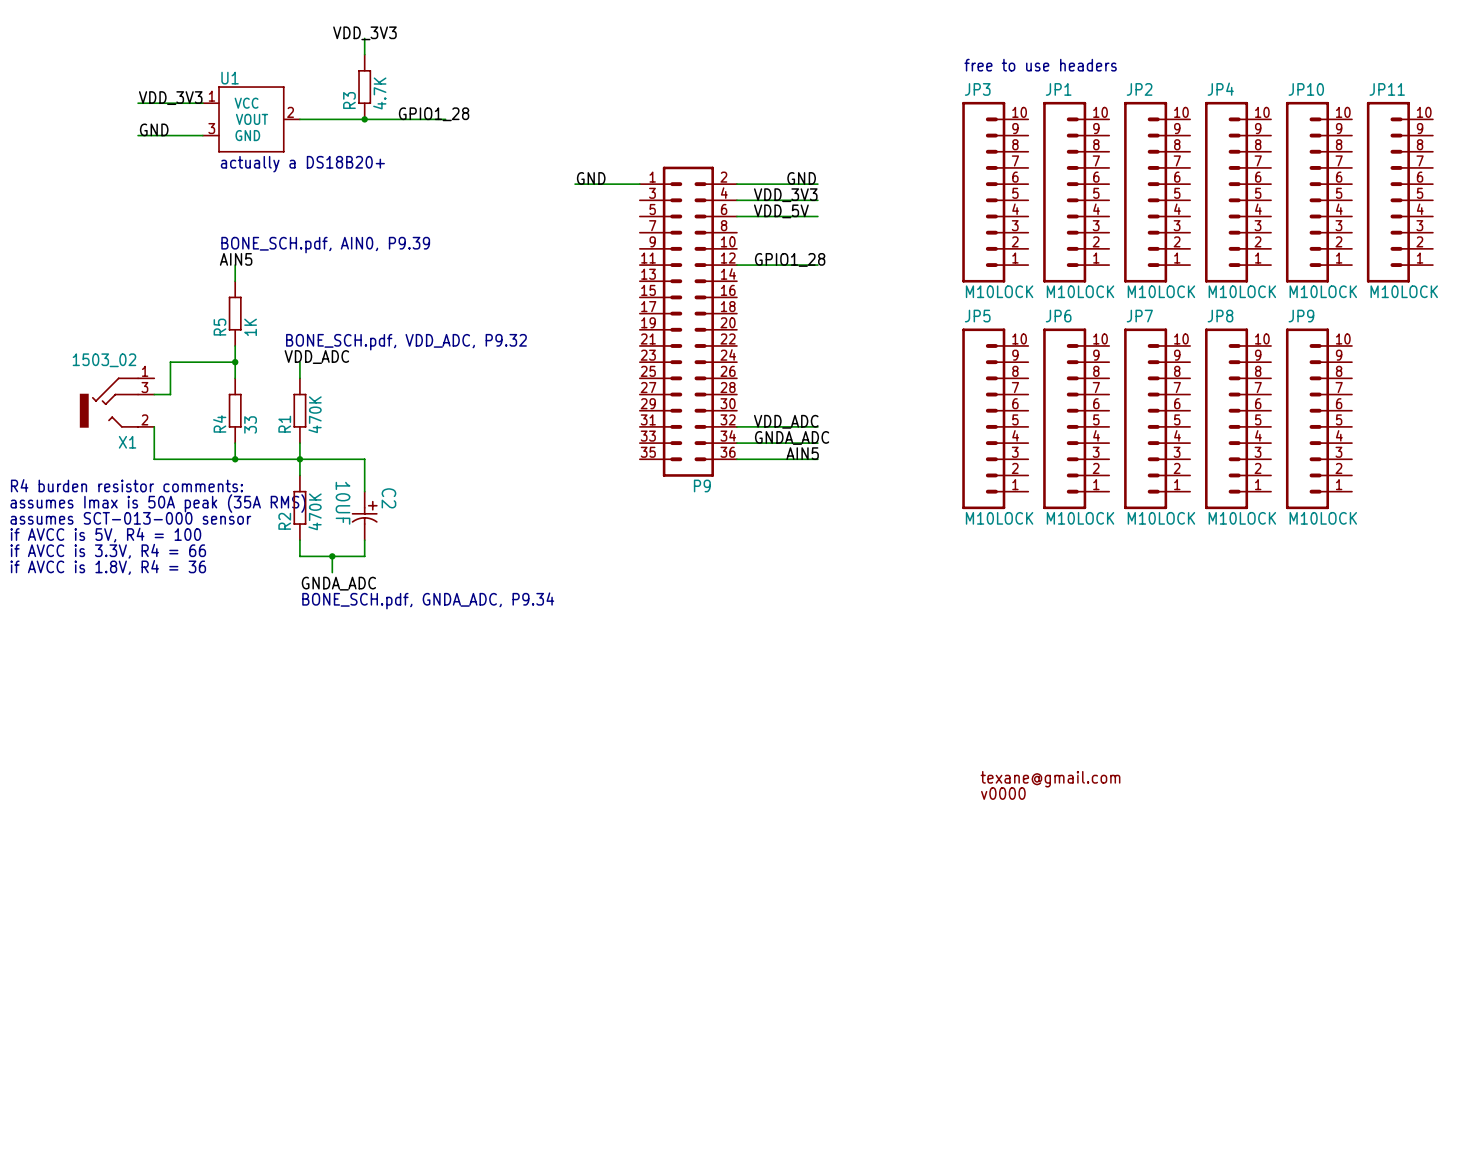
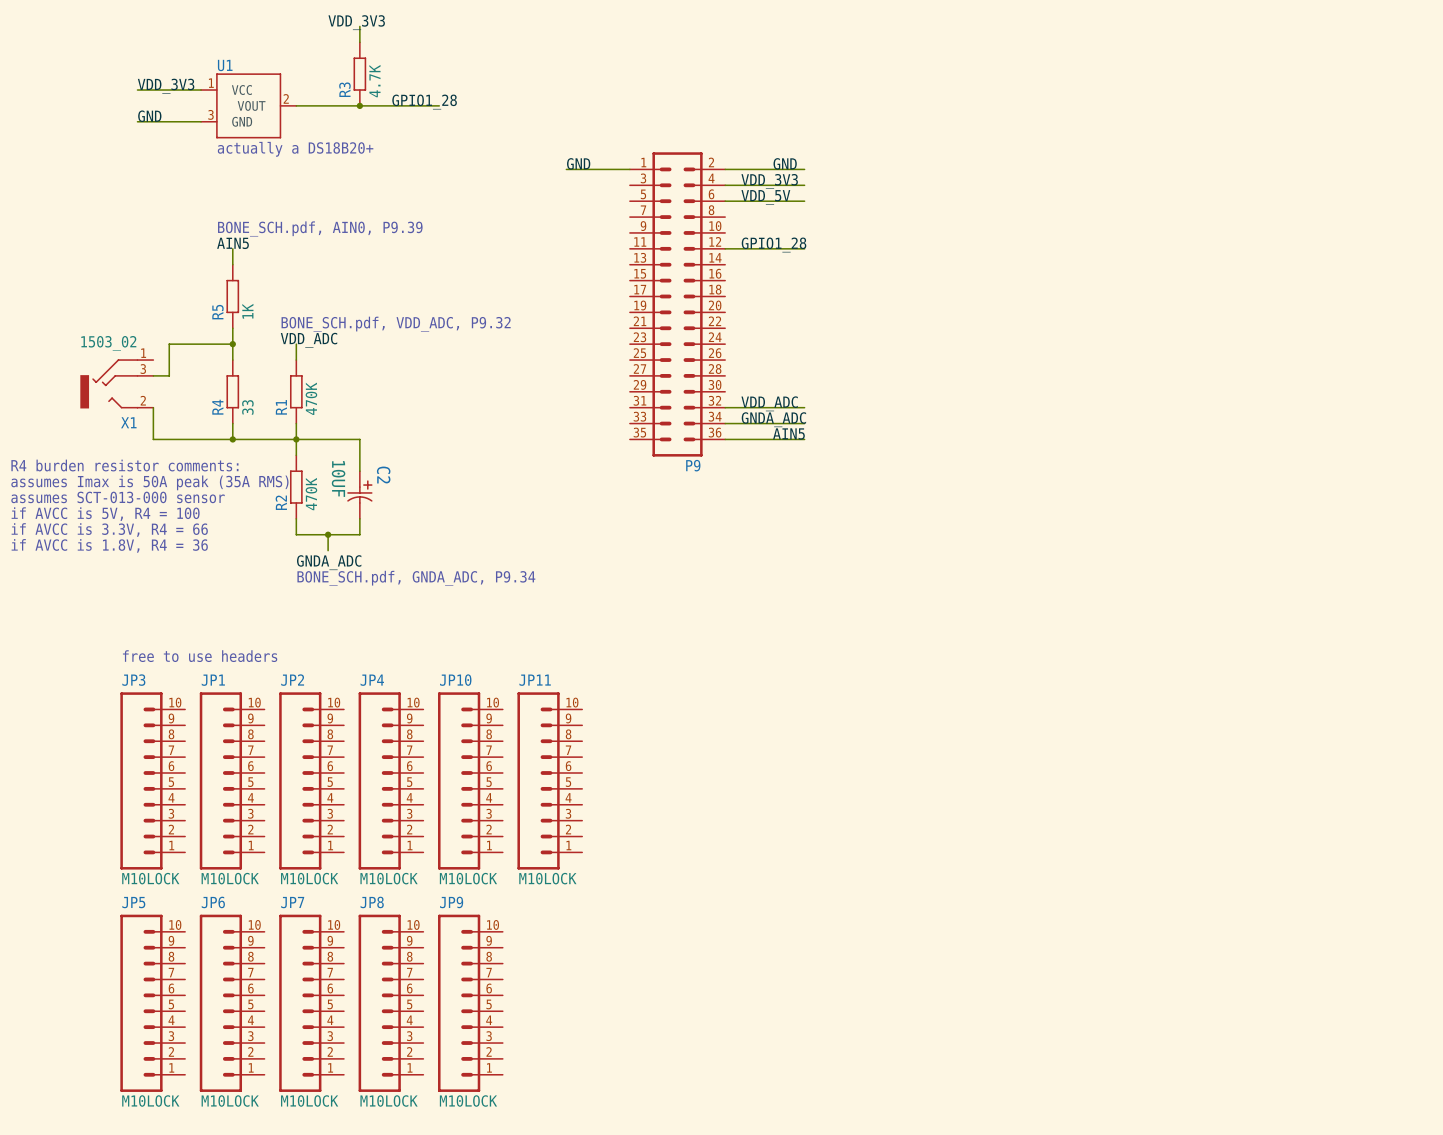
text: free to use headers (1040, 65) -> none
JP3 position: (995, 192) -> (152, 780)
JP1 position: (1076, 192) -> (232, 780)
JP2 position: (1157, 192) -> (311, 780)
JP4 position: (1238, 192) -> (390, 780)
JP10 position: (1318, 192) -> (470, 780)
JP11 position: (1399, 192) -> (549, 780)
JP5 position: (995, 418) -> (152, 1003)
JP6 position: (1076, 418) -> (232, 1003)
JP7 position: (1157, 418) -> (311, 1003)
JP8 position: (1238, 418) -> (390, 1003)
JP9 position: (1318, 418) -> (470, 1003)
text: none -> free to use headers (200, 656)
text: texane@gmail.com (1050, 779) -> none
text: v0000 (1003, 793) -> none

